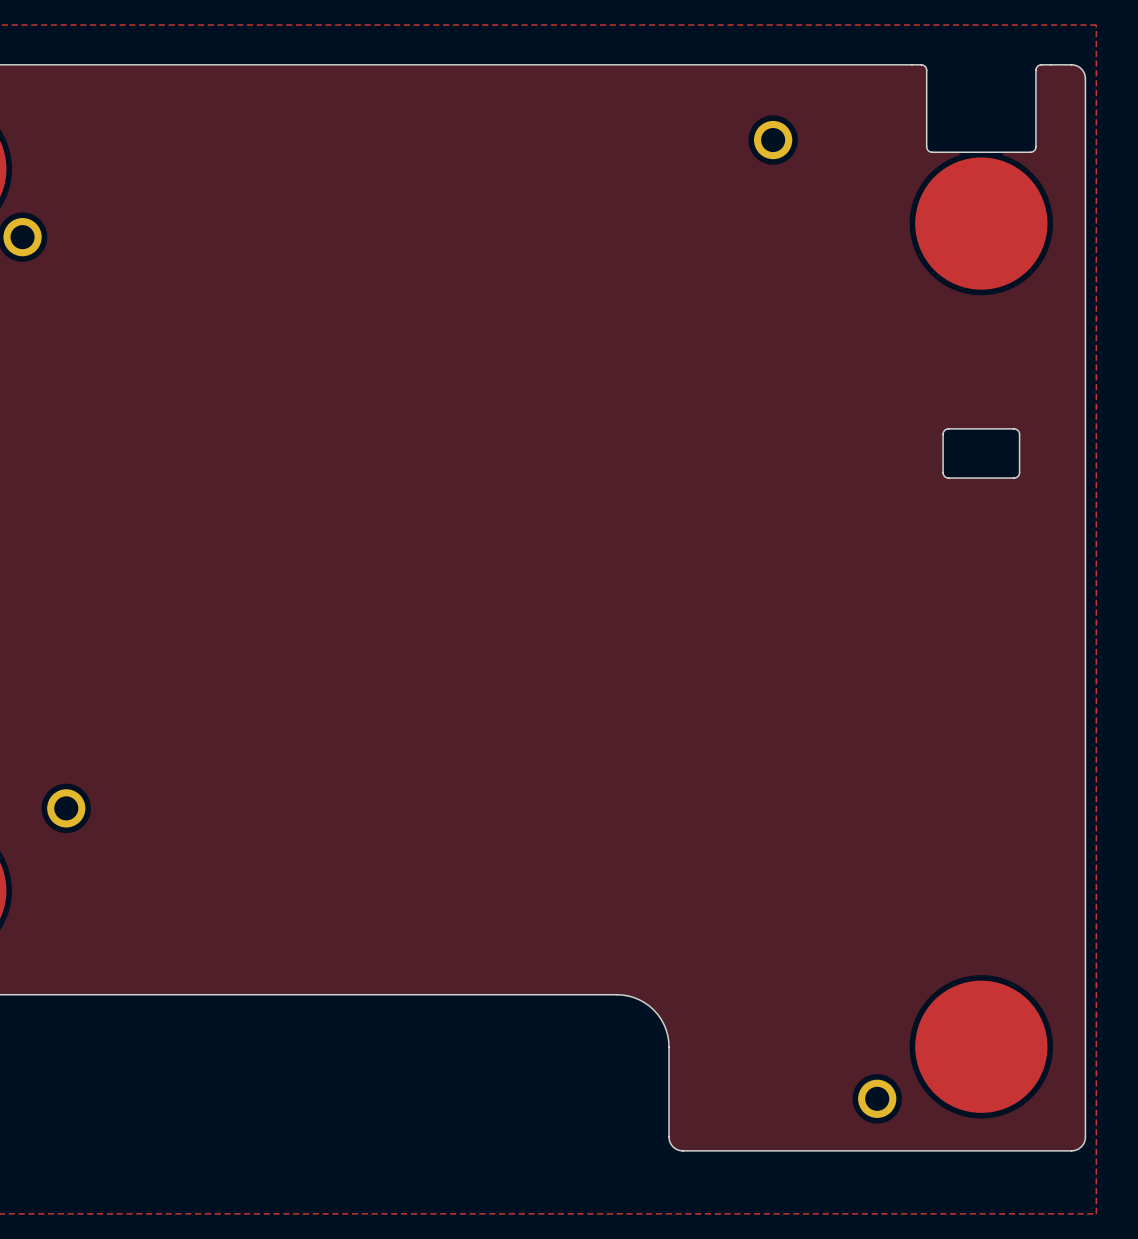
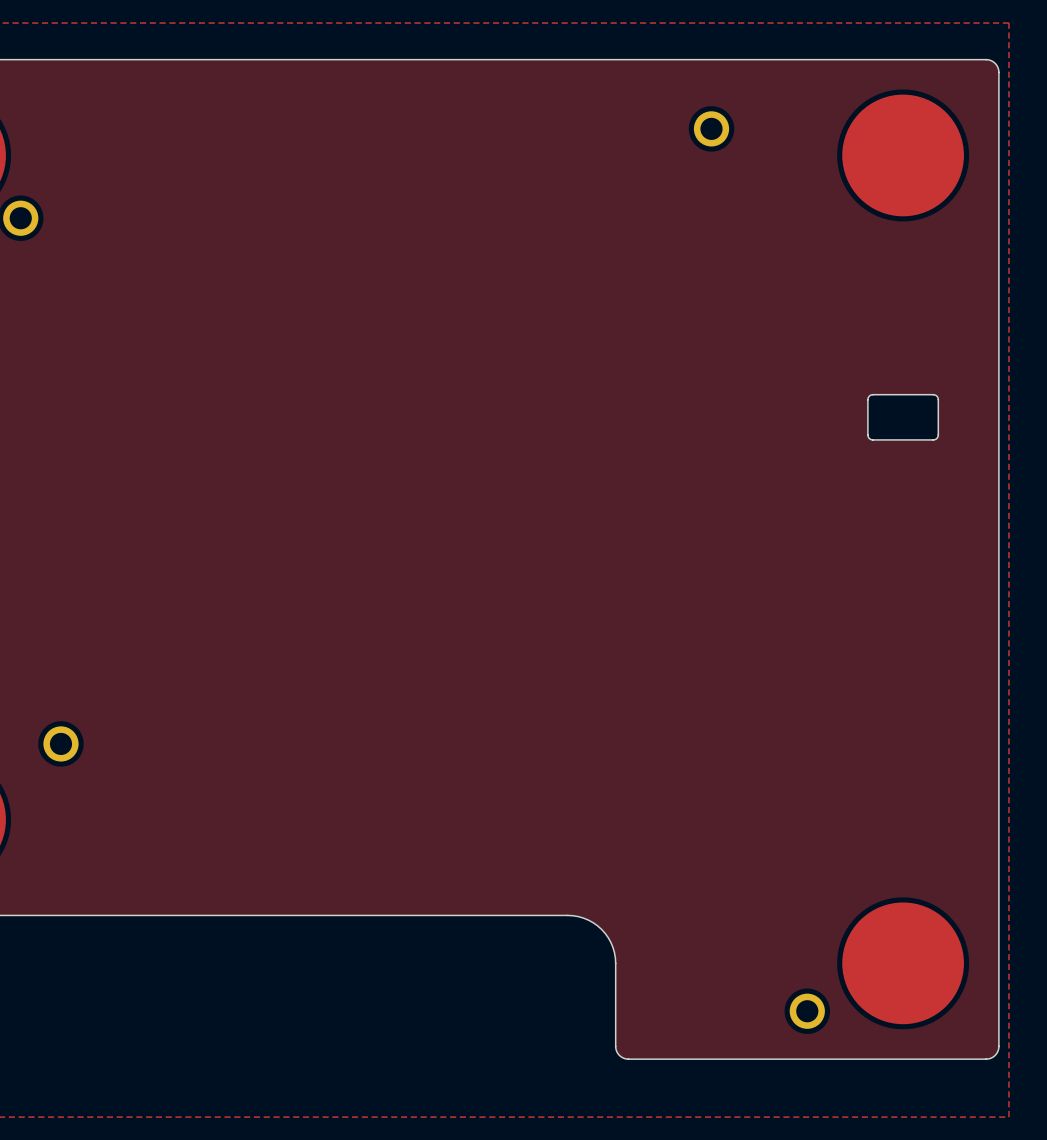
board edge: none -> (839, 59) (966, 59)
drawing: [911, 64, 1052, 153] -> none
drawing position: (981, 223) -> (903, 155)

